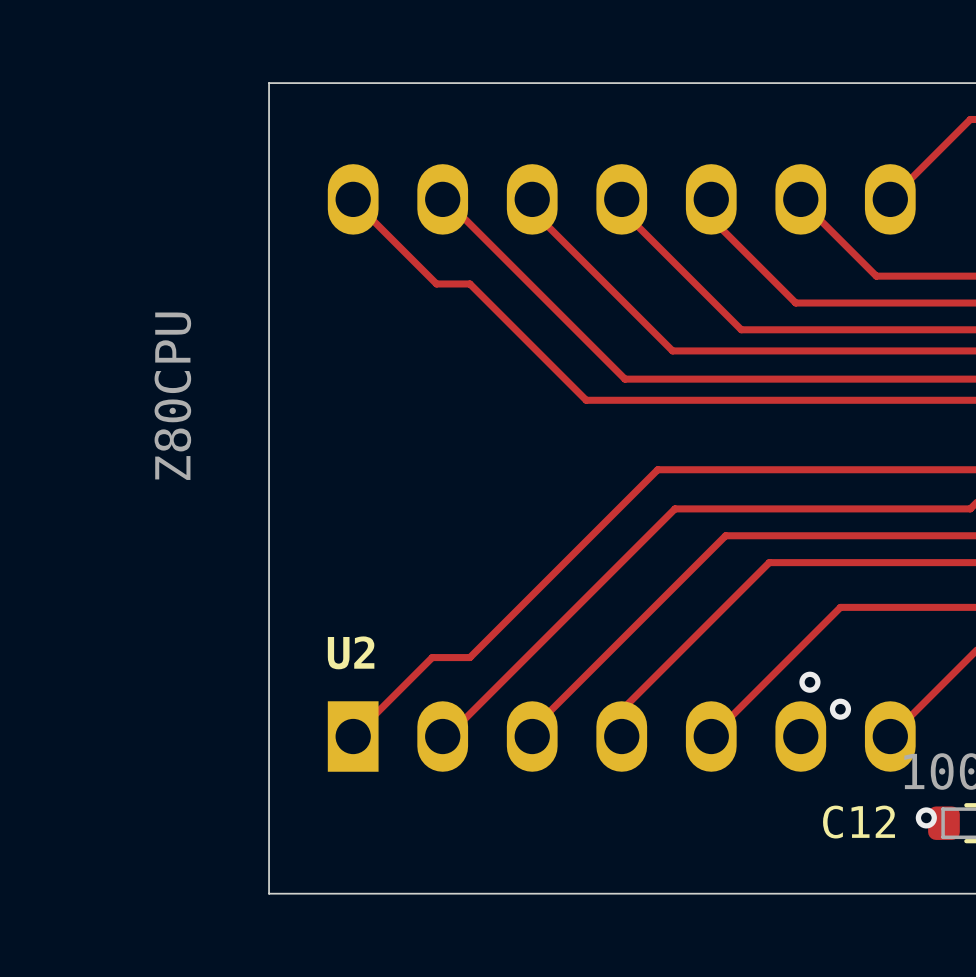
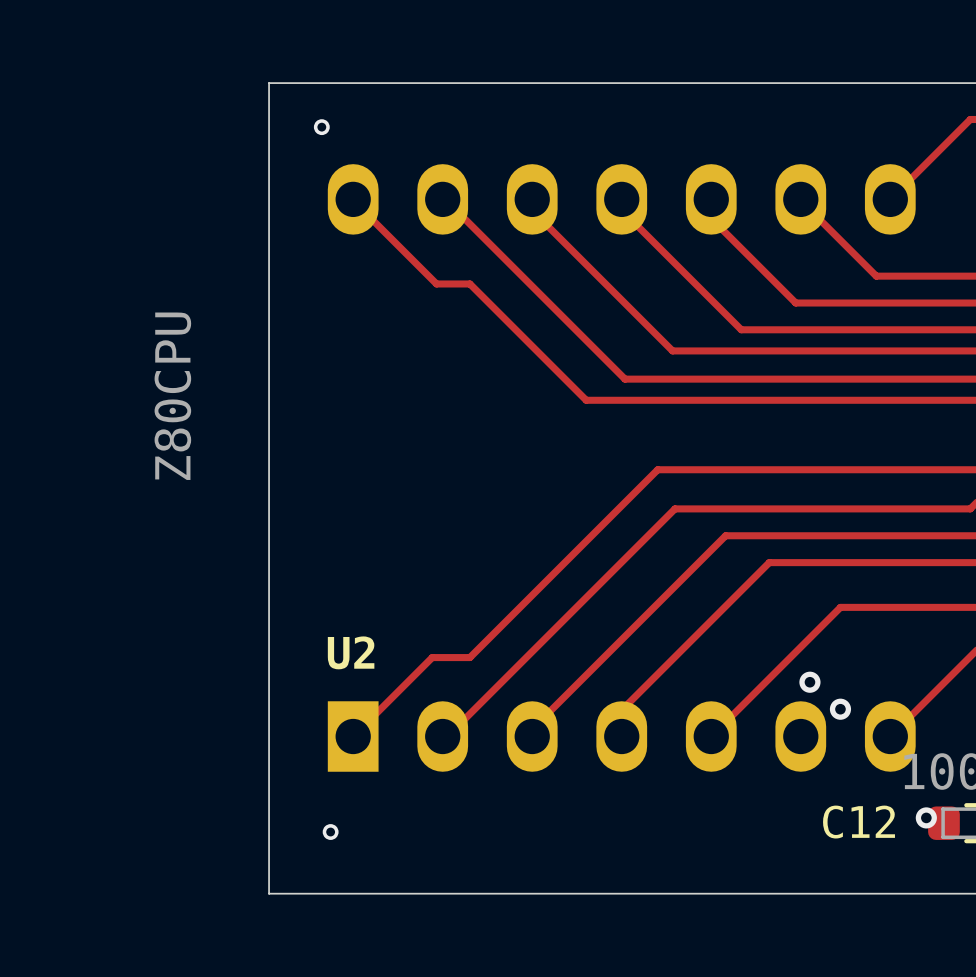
via: none -> (321, 127)
via: none -> (330, 832)

